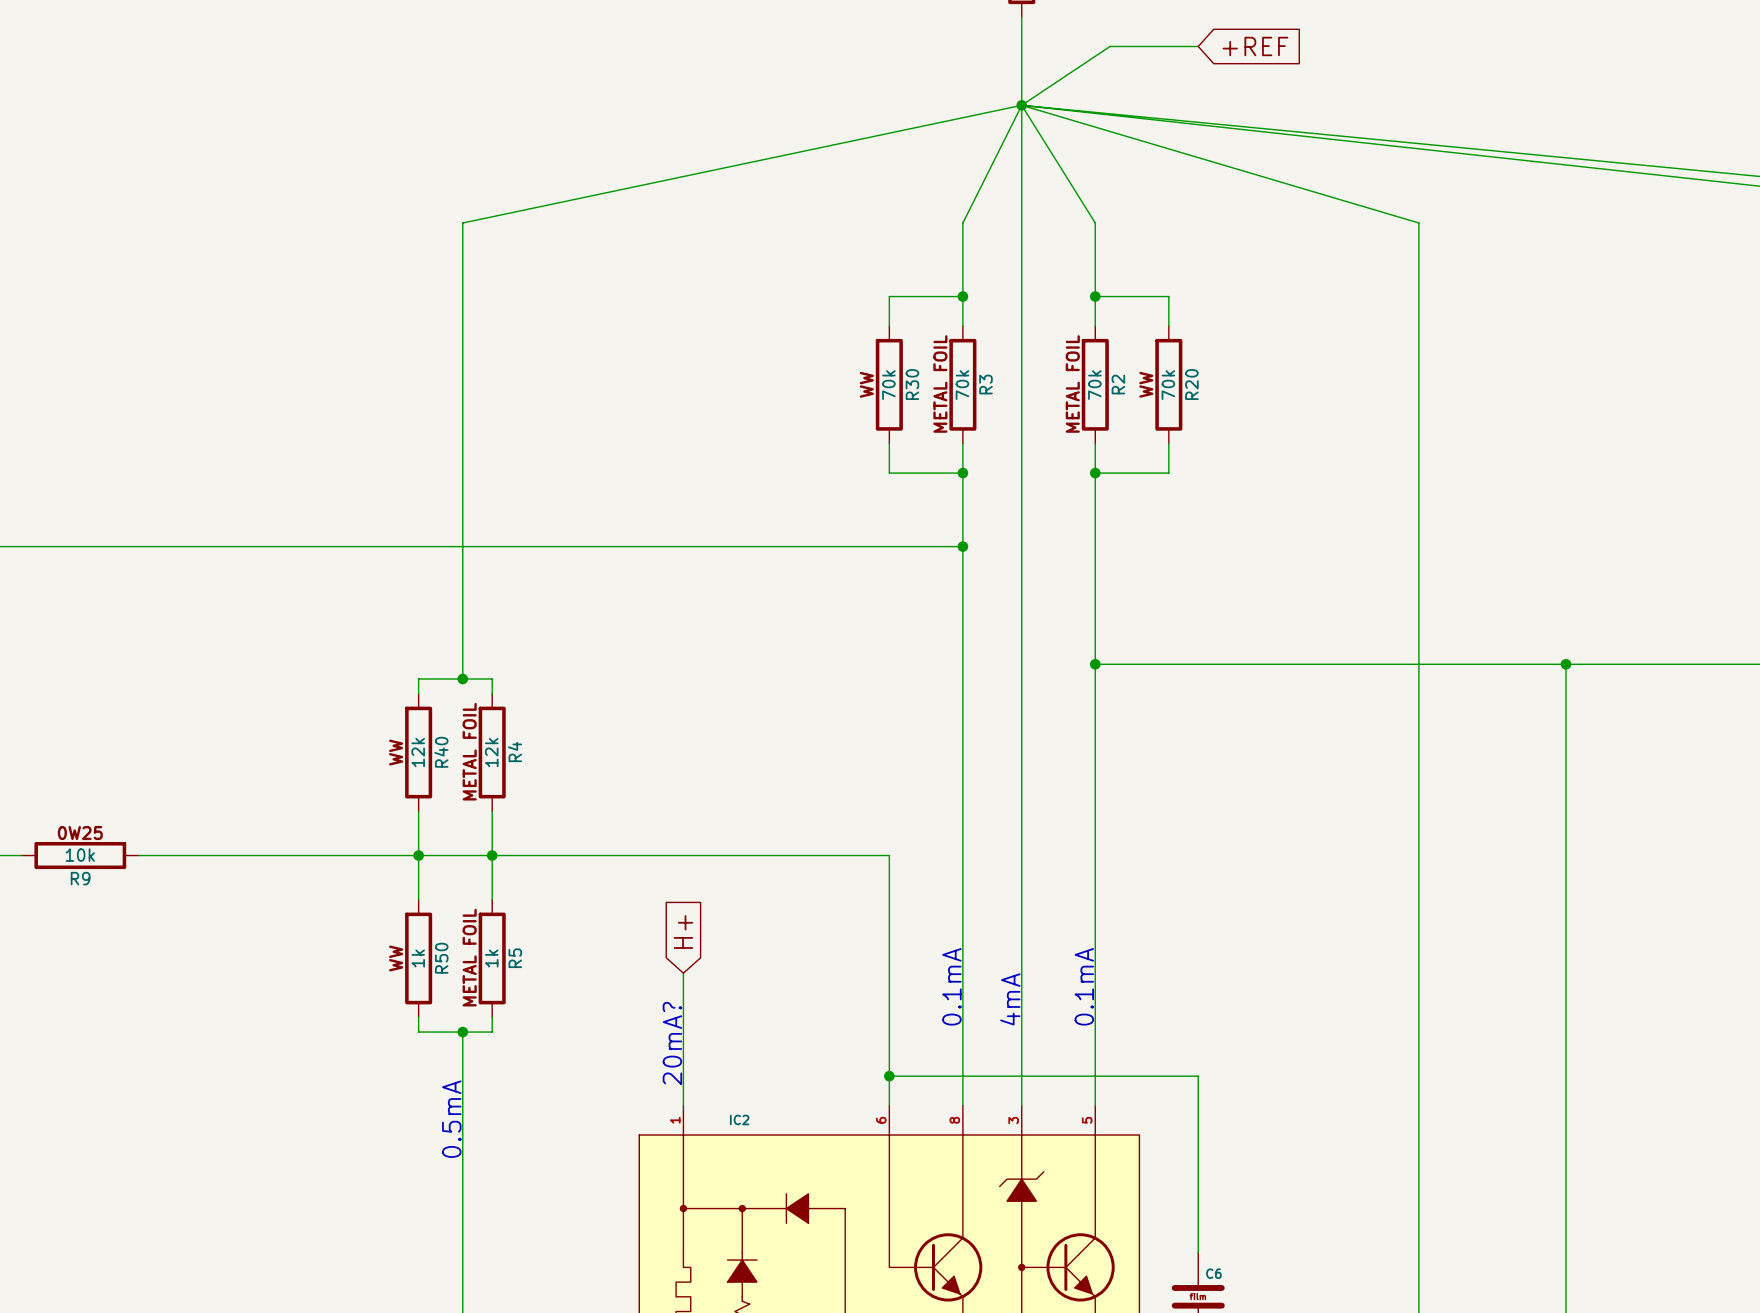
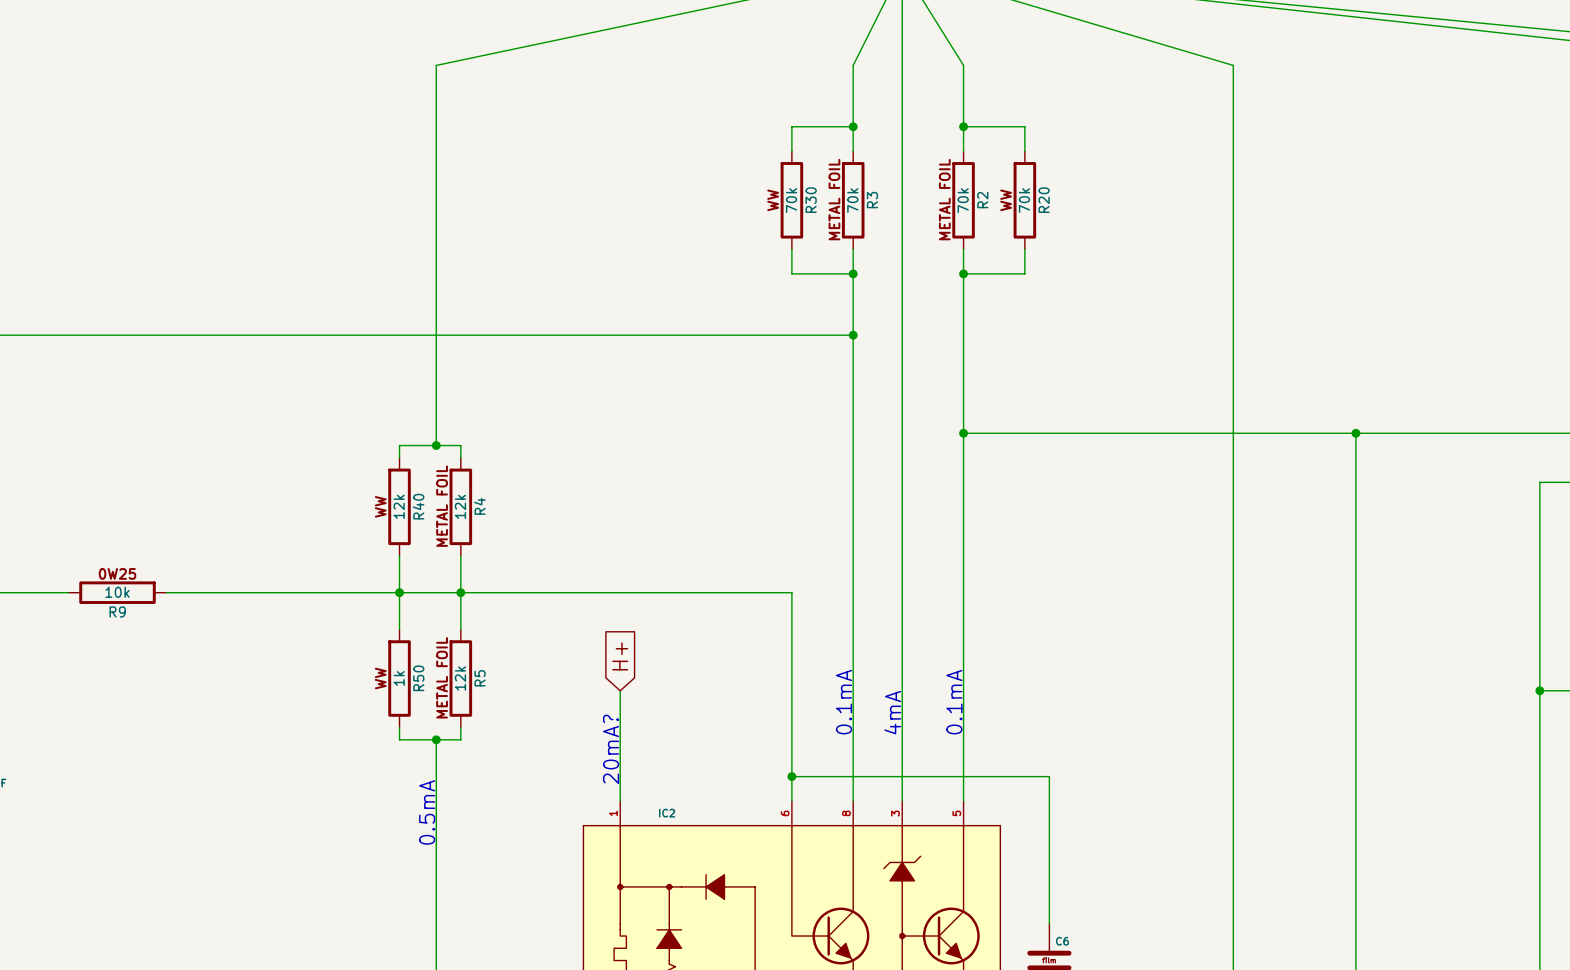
R5 value: 1k (491, 958) -> 12k (460, 678)

